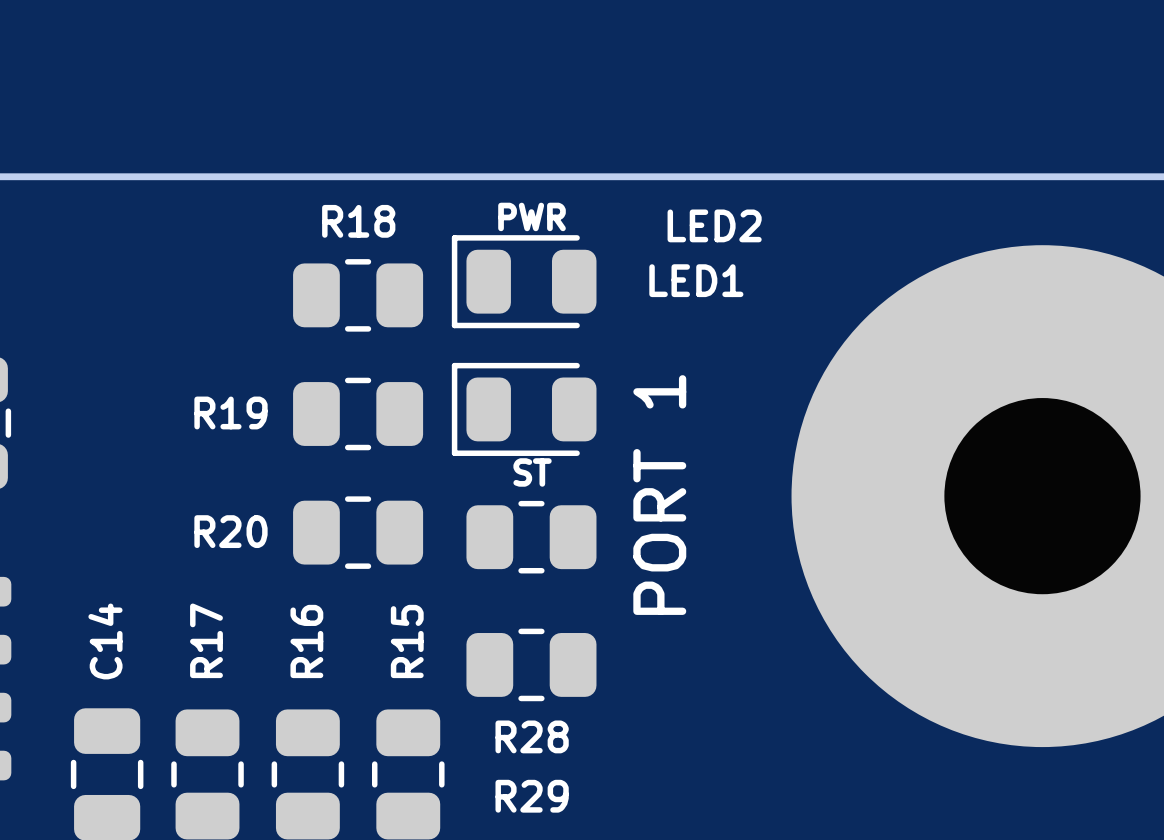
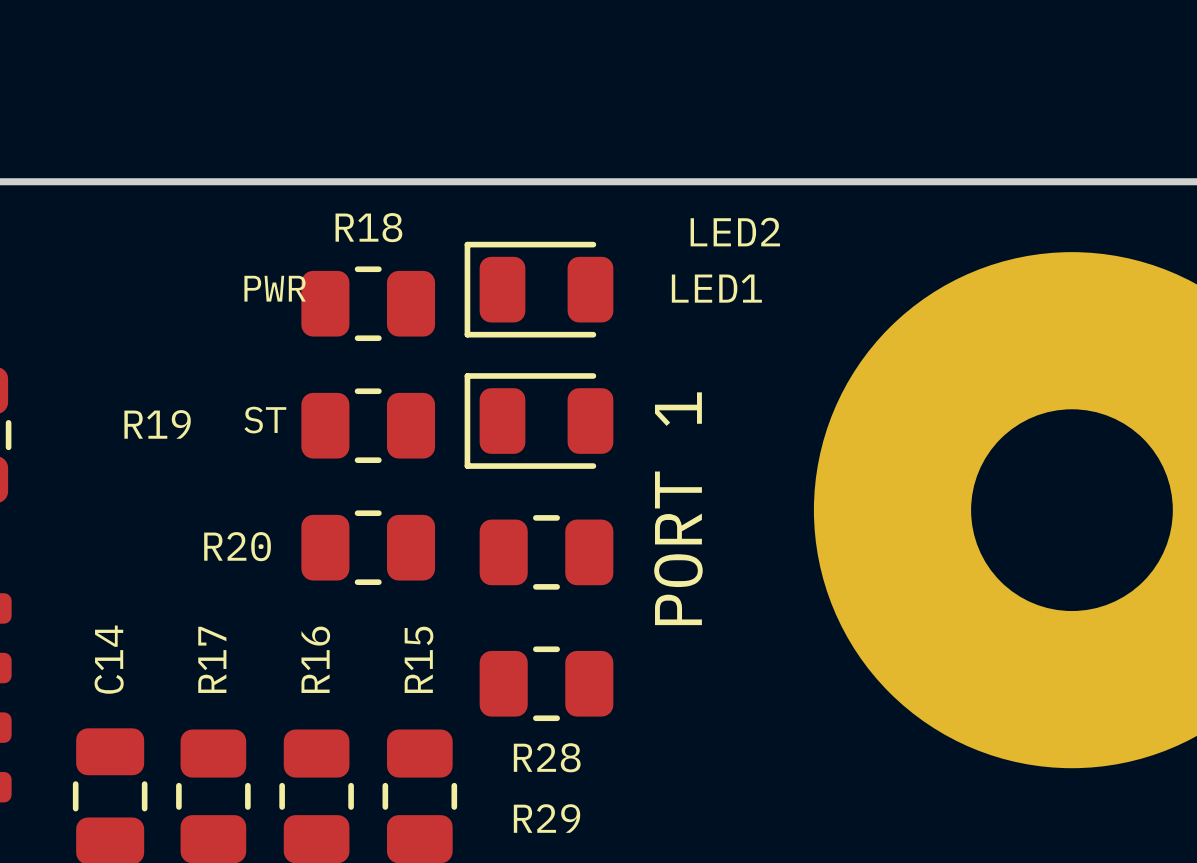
text position: PWR (532, 216) -> PWR (275, 288)
R19 name position: R19 (230, 412) -> R19 (157, 424)
text position: ST (532, 472) -> ST (265, 420)

